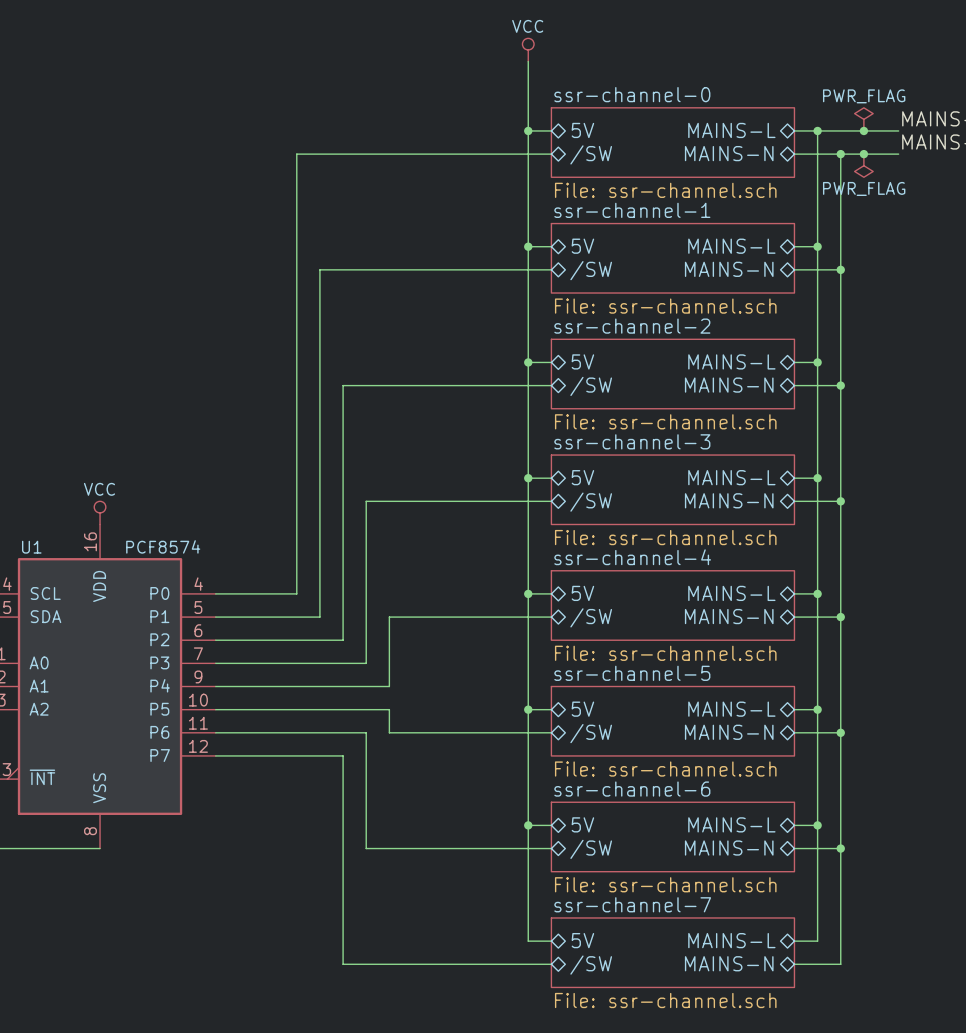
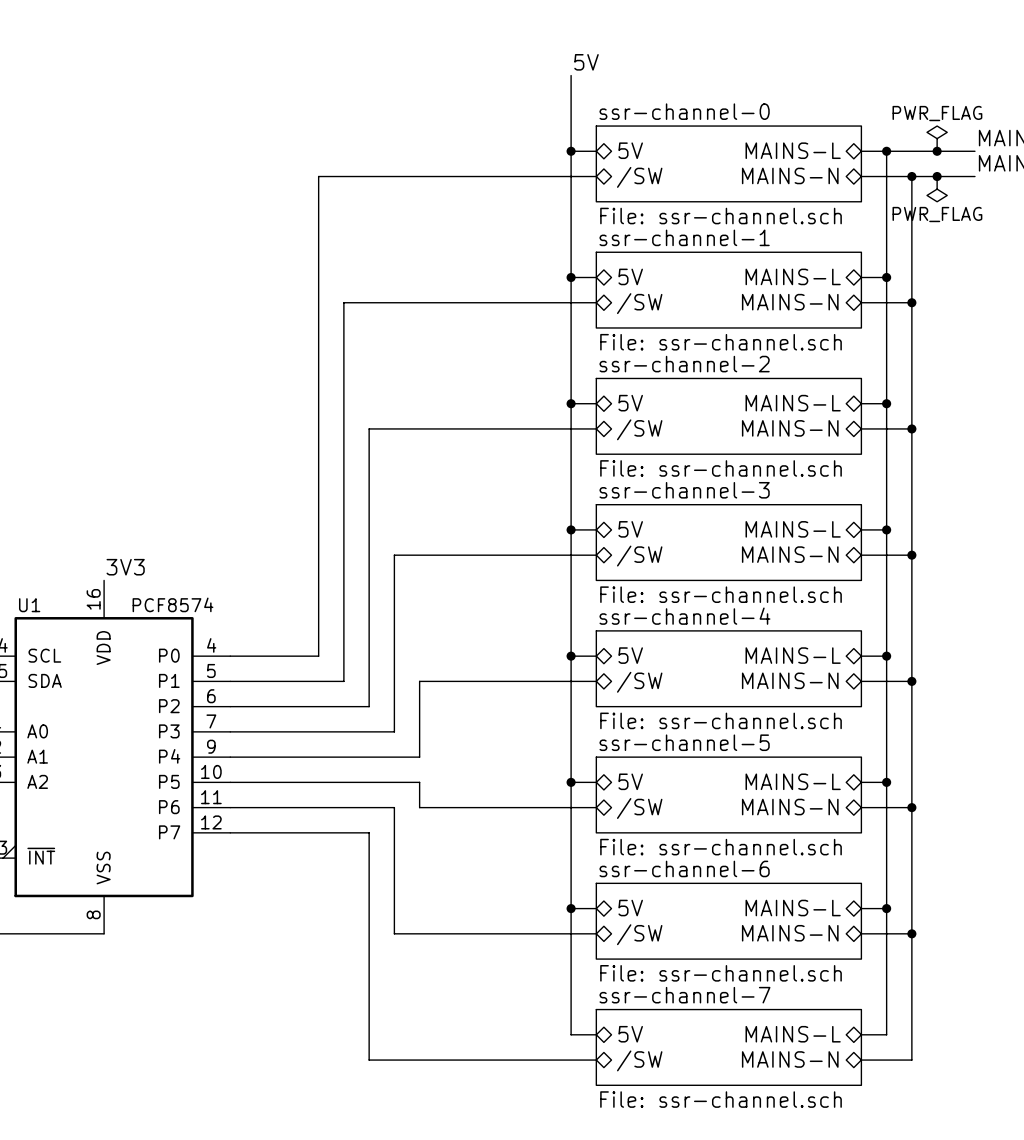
power symbol: VCC (528, 49) -> none
label: none -> 5V (586, 62)
power symbol: VCC (100, 512) -> none
label: none -> 3V3 (125, 567)

